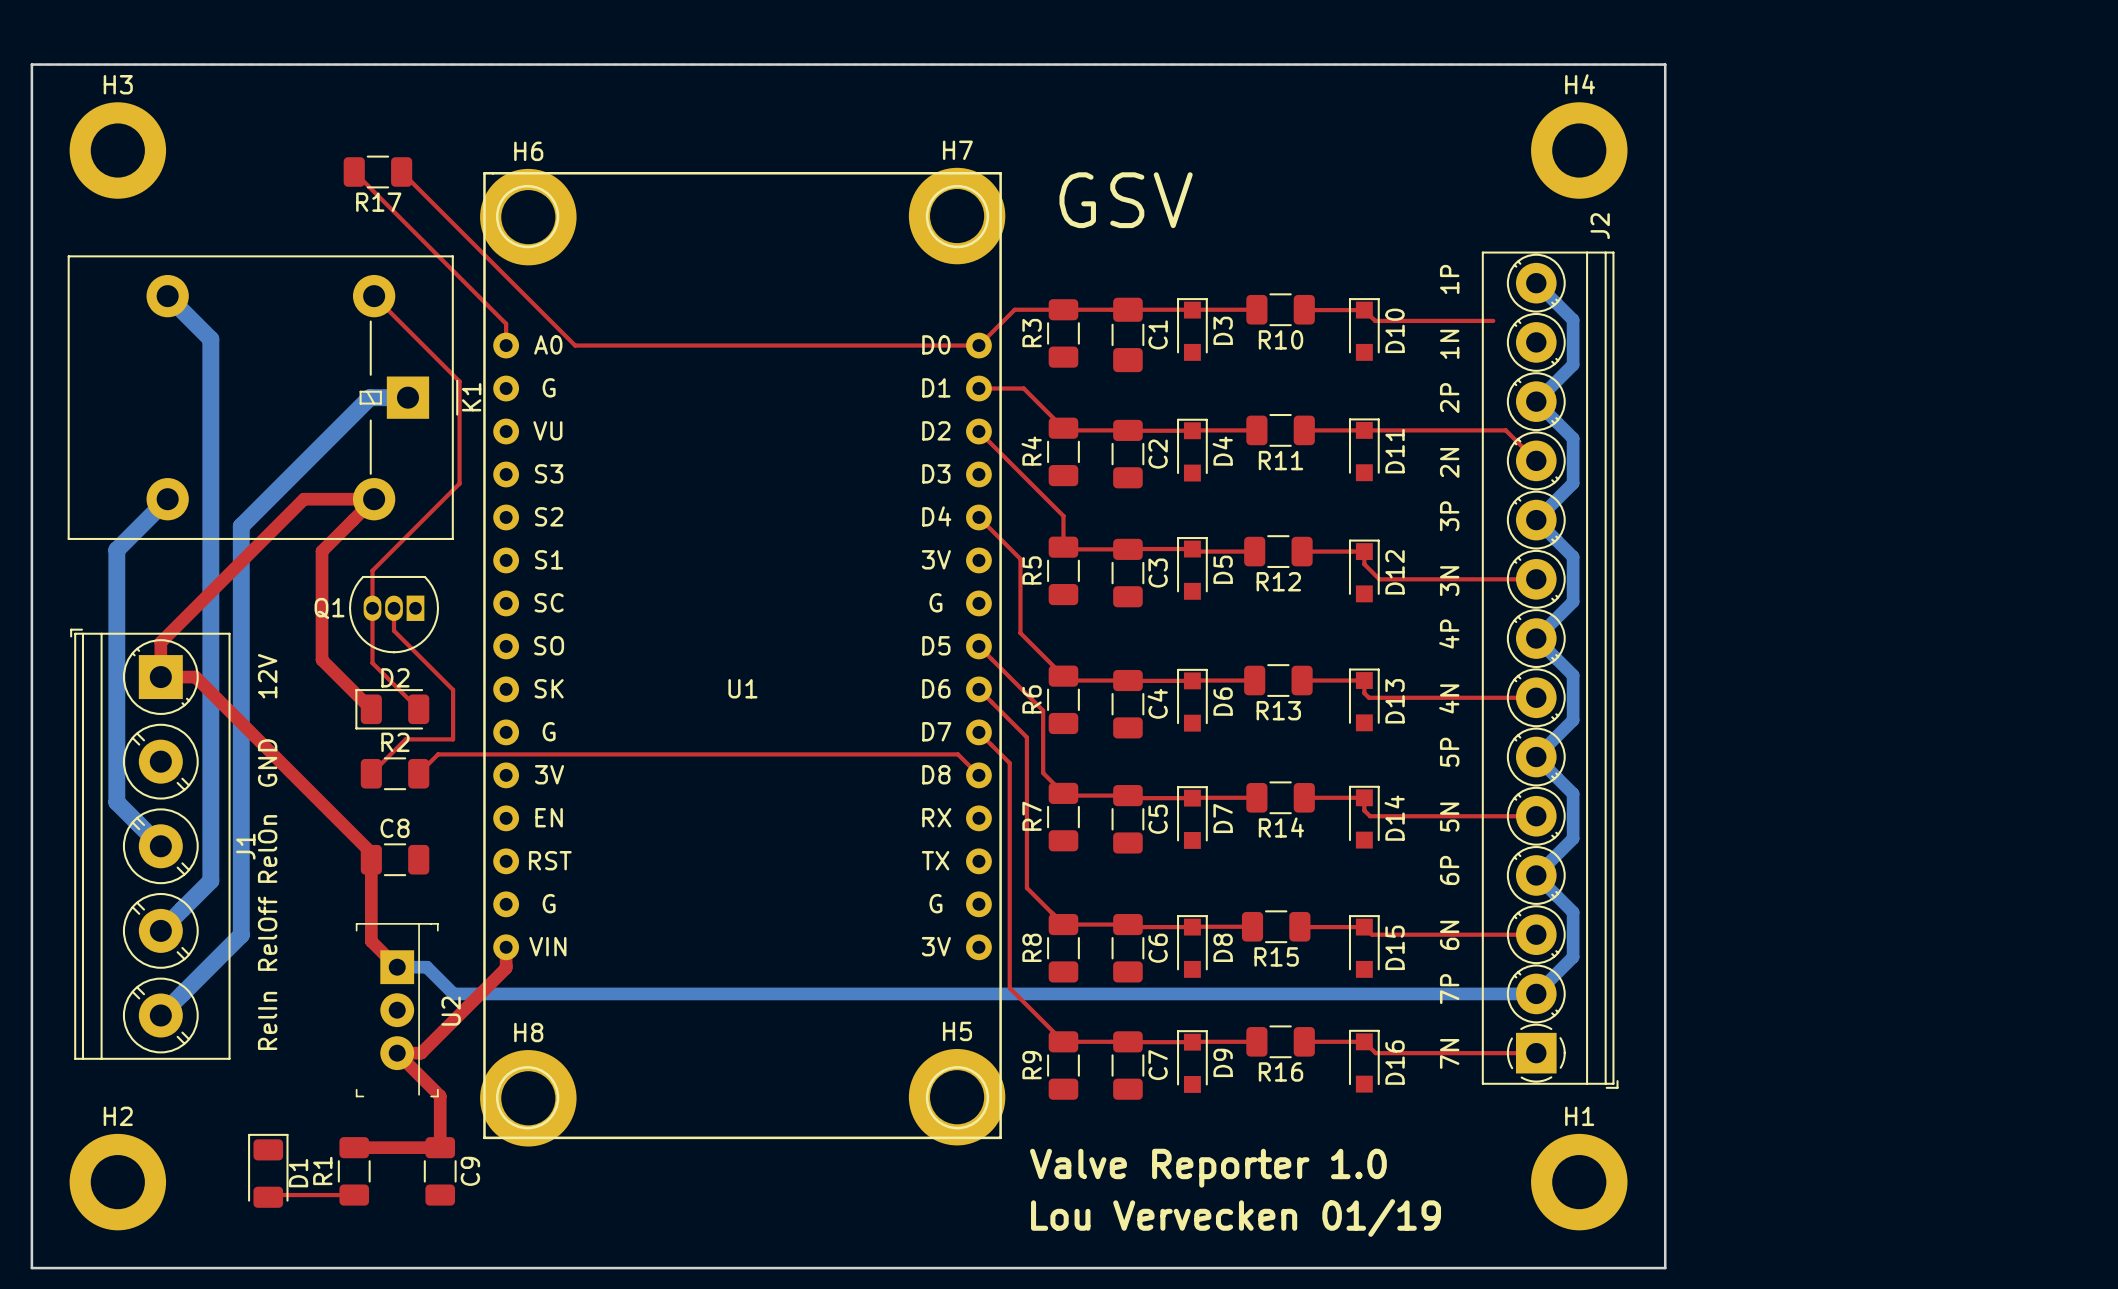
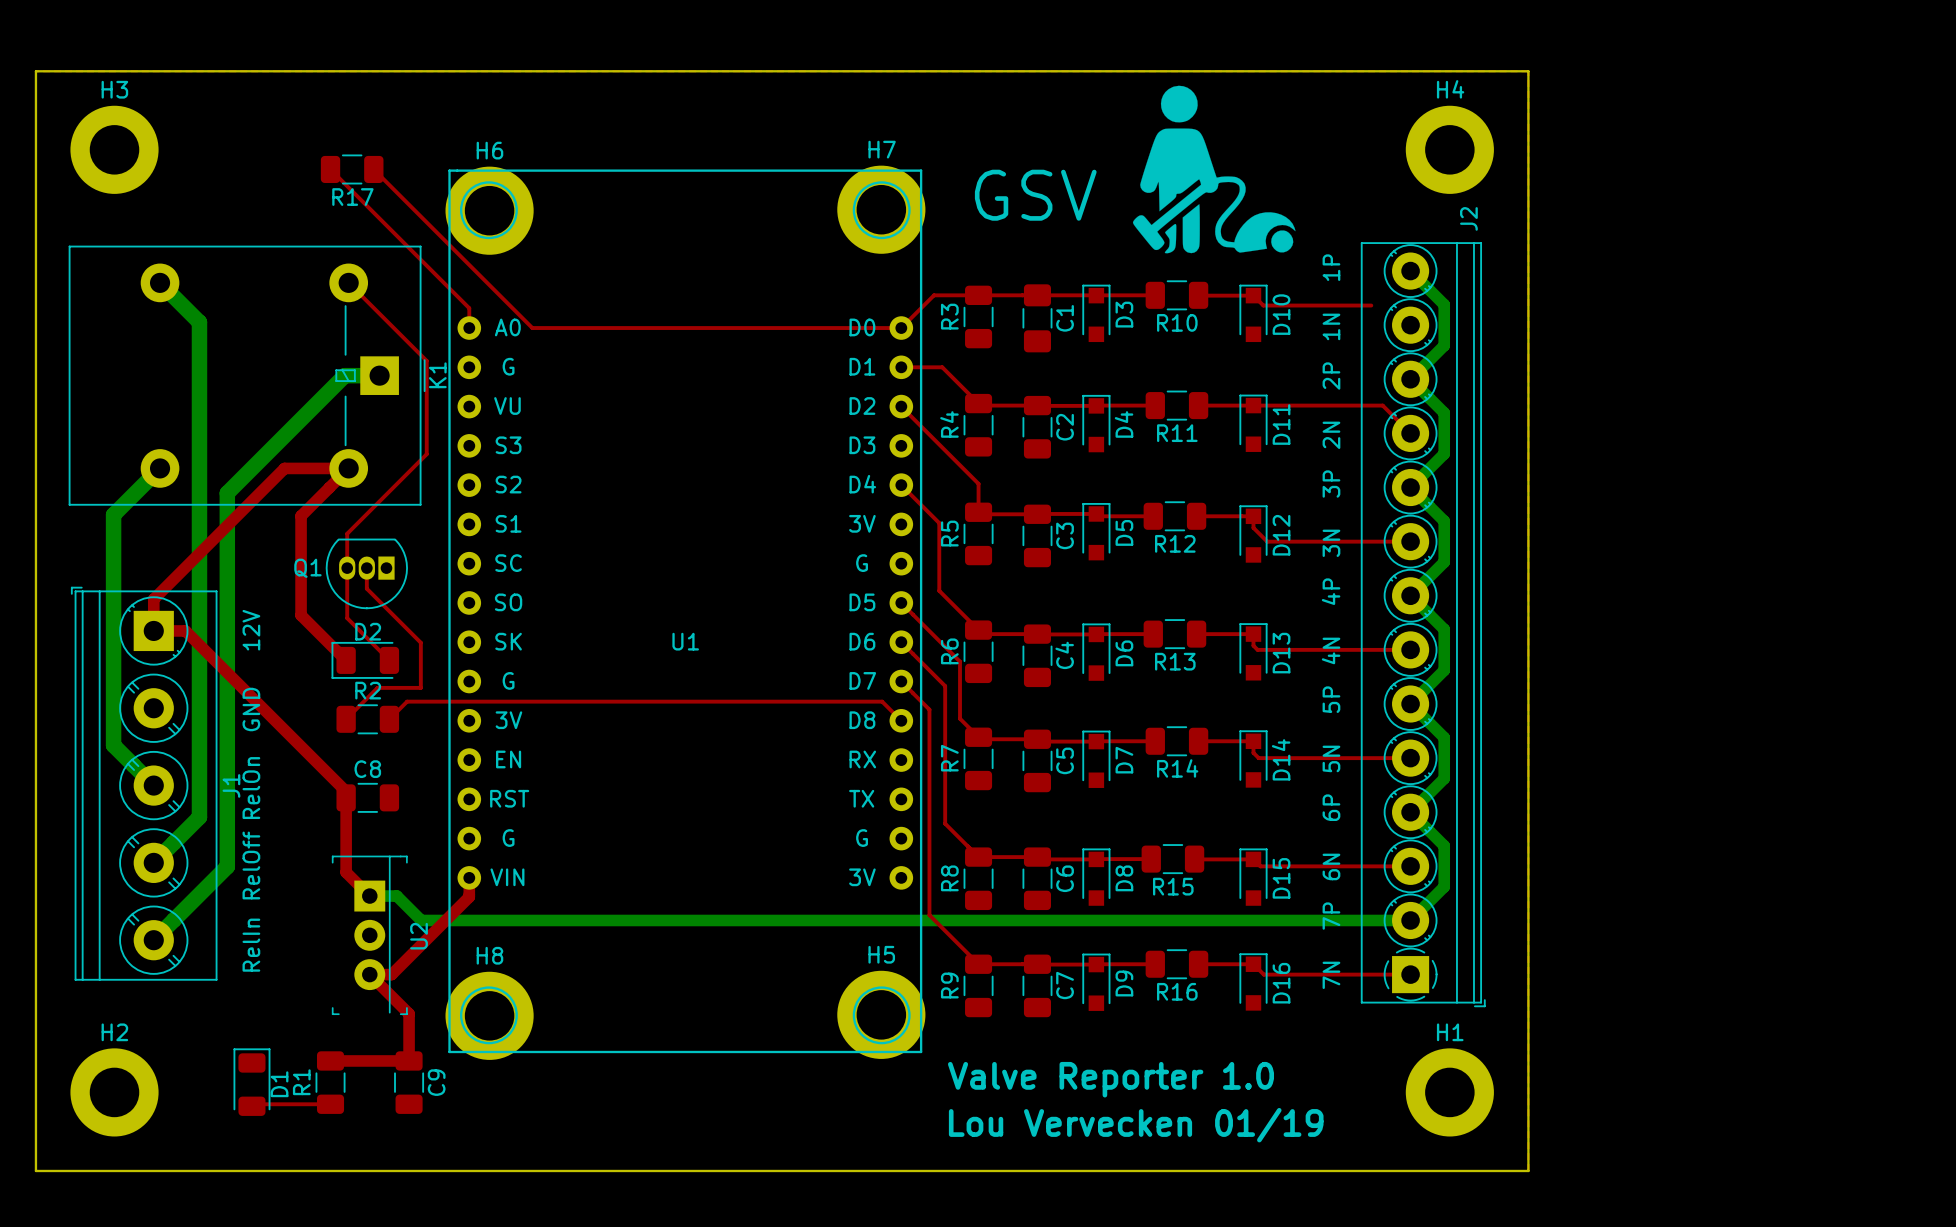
drawing: none -> [1132, 85, 1296, 254]

